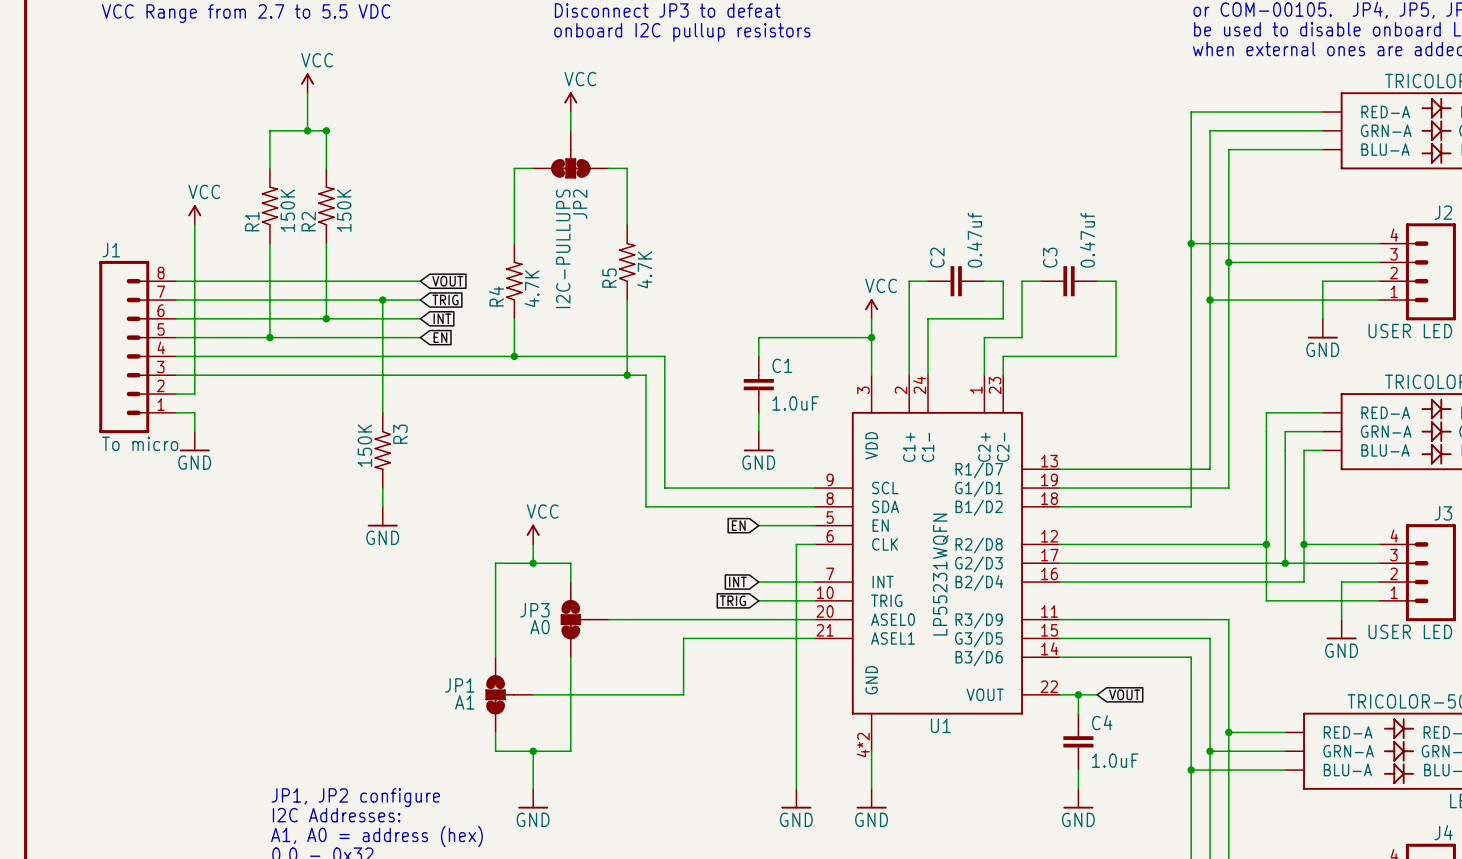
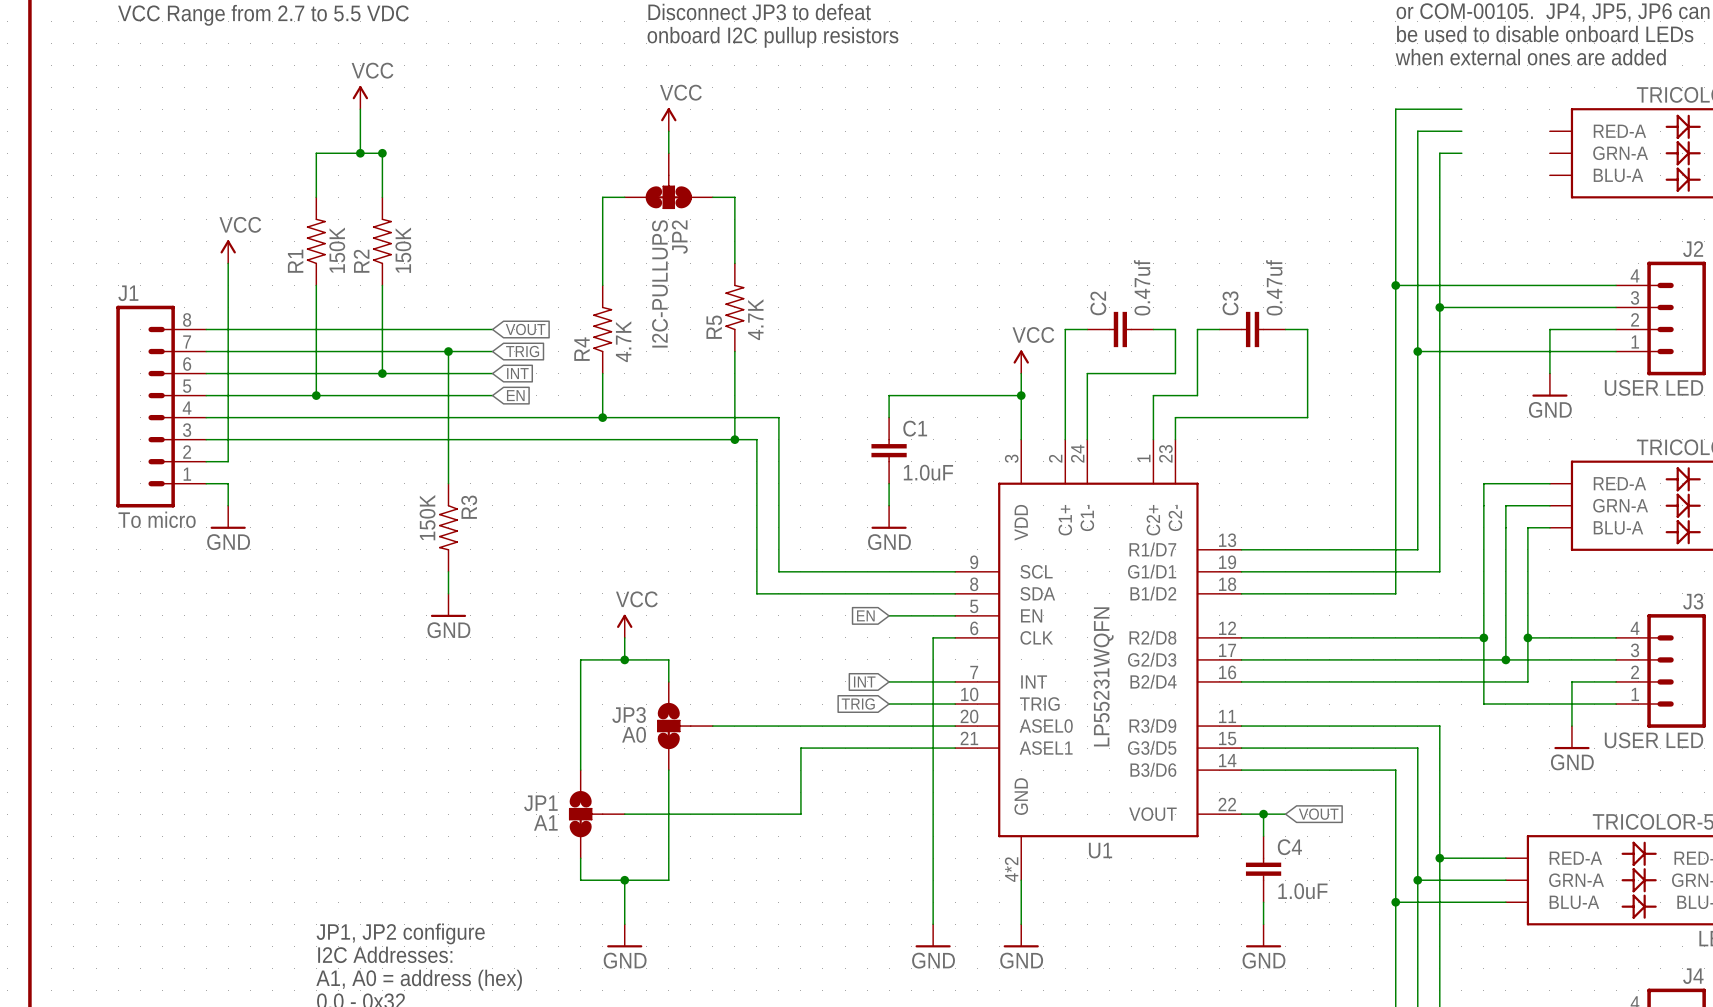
wire: (1191, 112) (1210, 112) -> (1395, 131) (1395, 109) (1461, 109)
wire: (1247, 112) (1322, 112) -> none
wire: (1210, 130) (1228, 130) -> (1417, 153) (1417, 131)
wire: (1247, 130) (1322, 130) -> none
wire: (1228, 149) (1322, 149) -> (1439, 175) (1439, 153)

